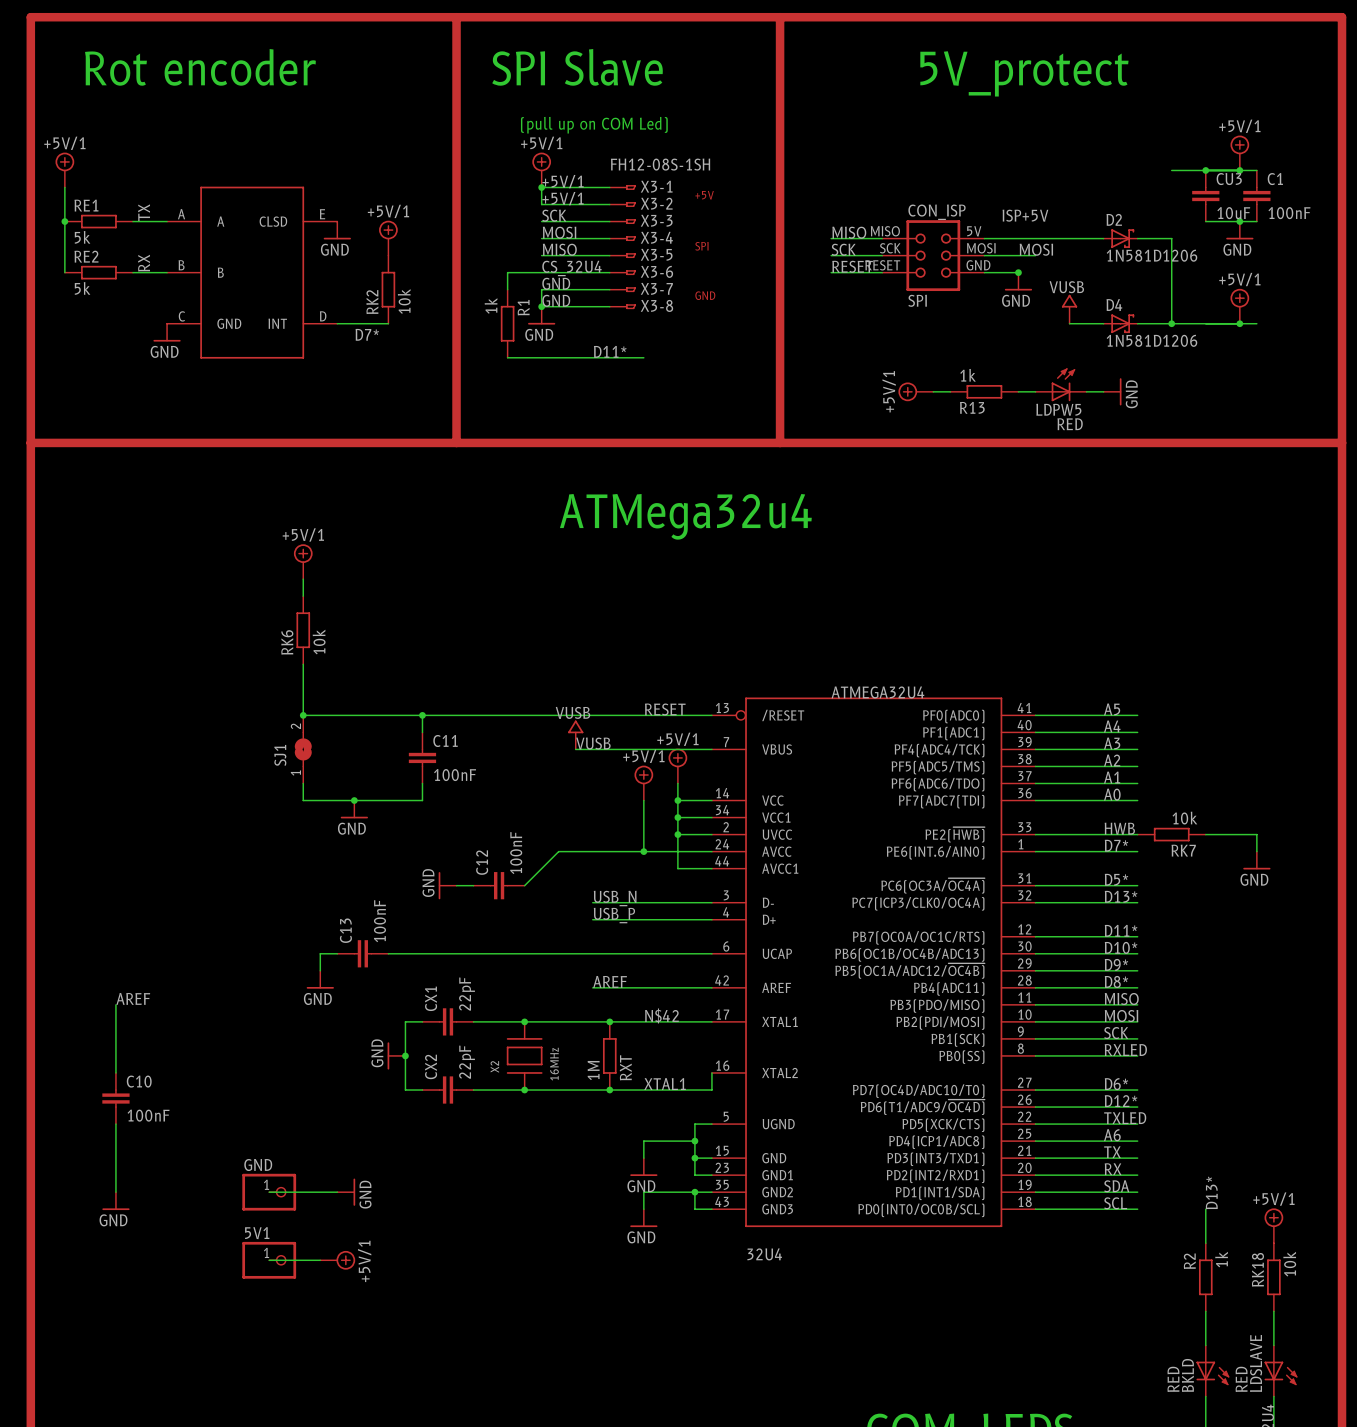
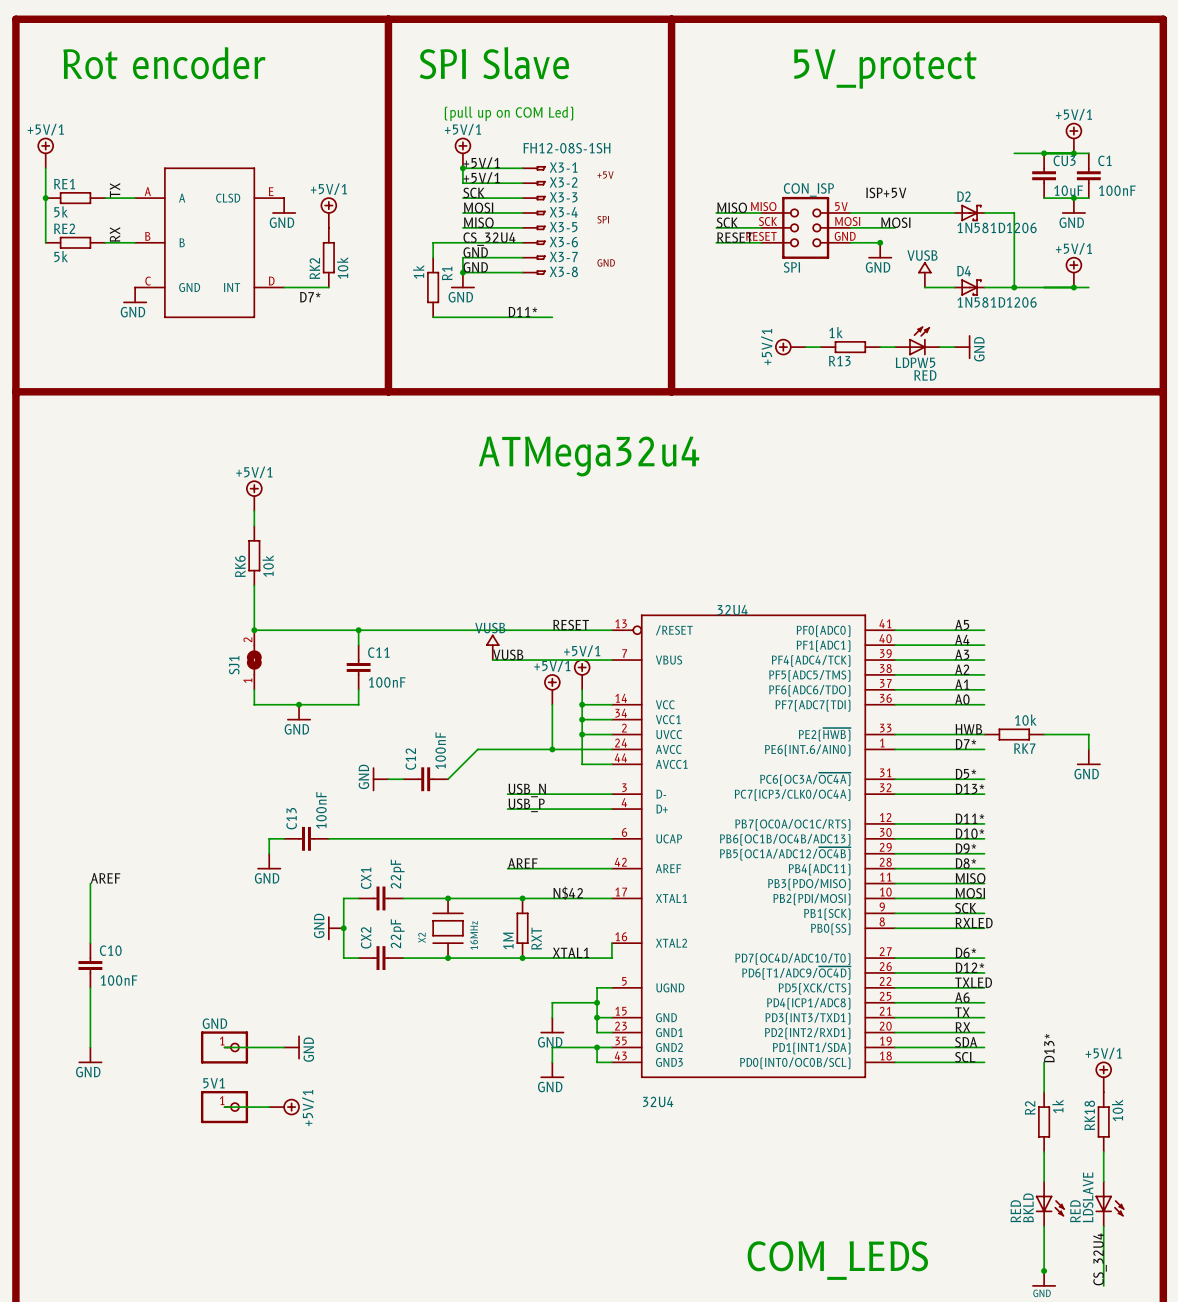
32U4 value: ATMEGA32U4 (877, 692) -> 32U4 (732, 610)

